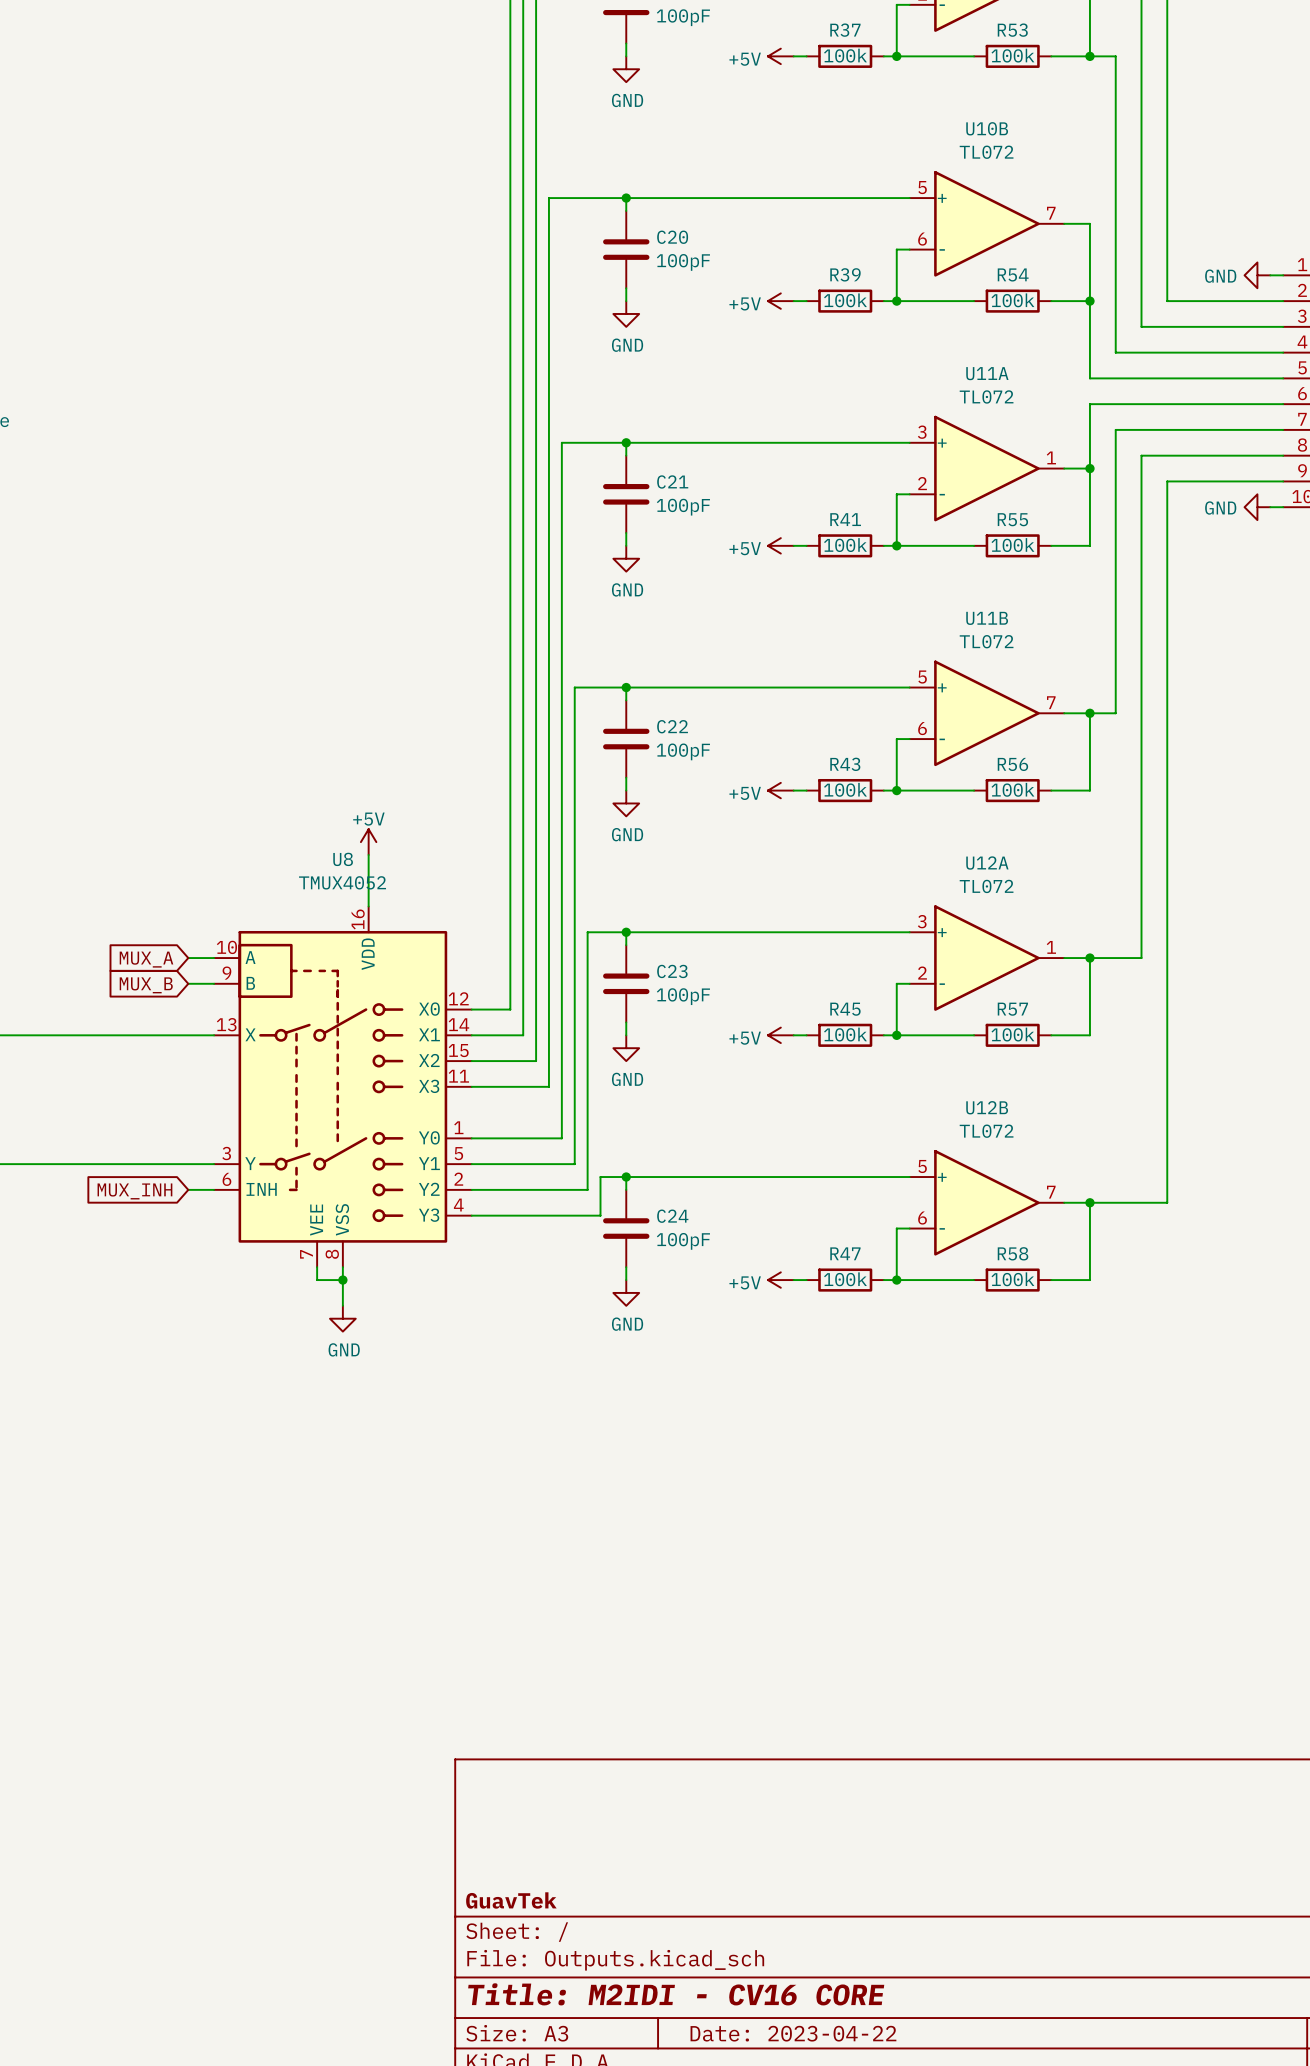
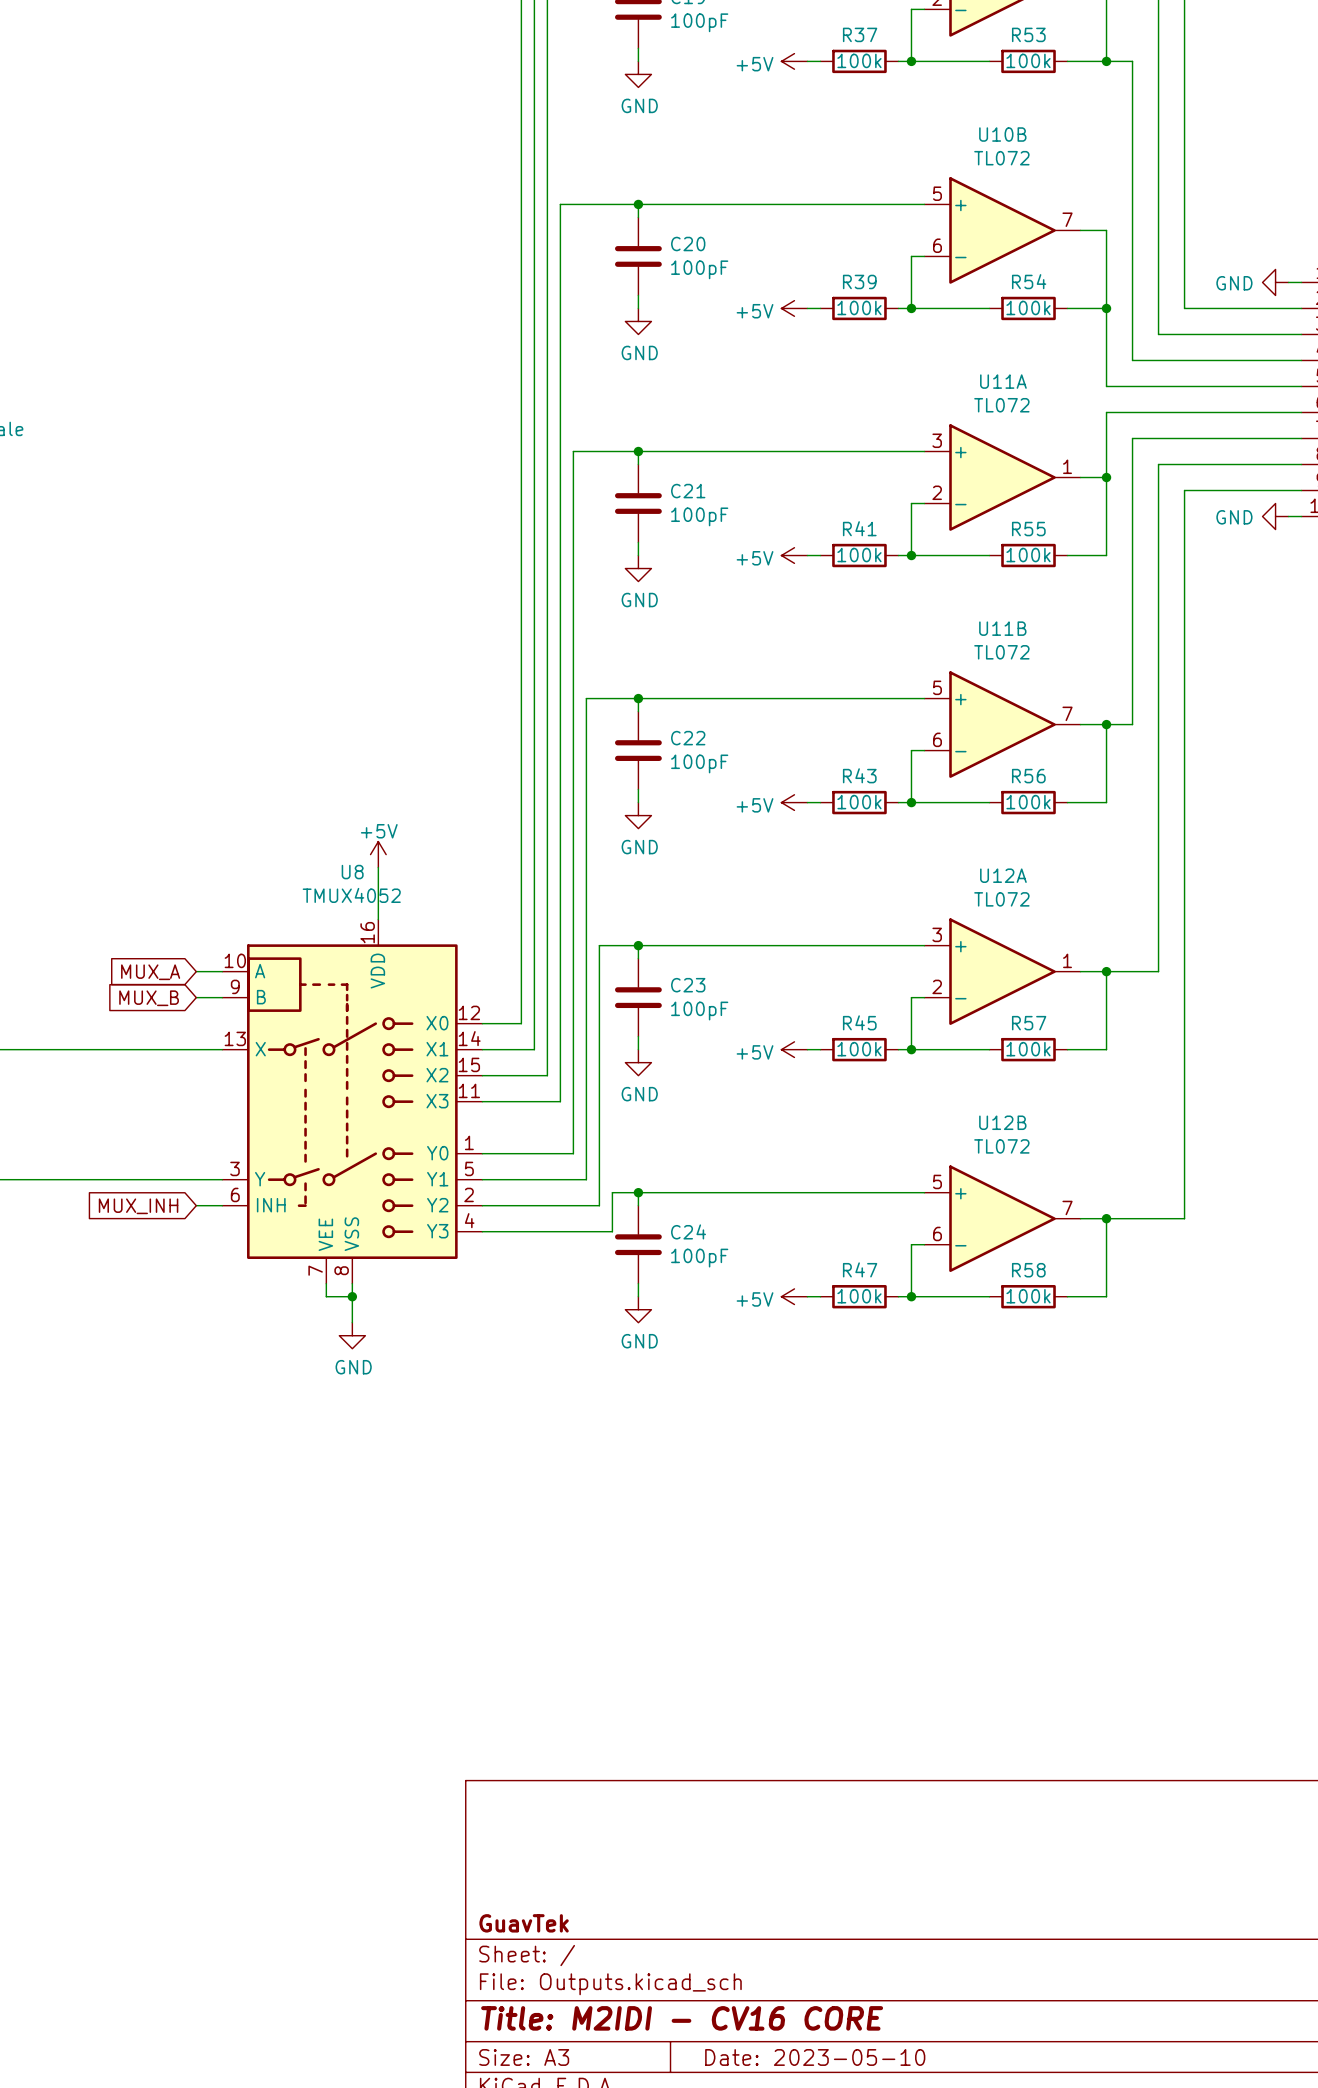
title block: Date: 2023-04-22 (793, 2033) -> Date: 2023-05-10 (815, 2057)

